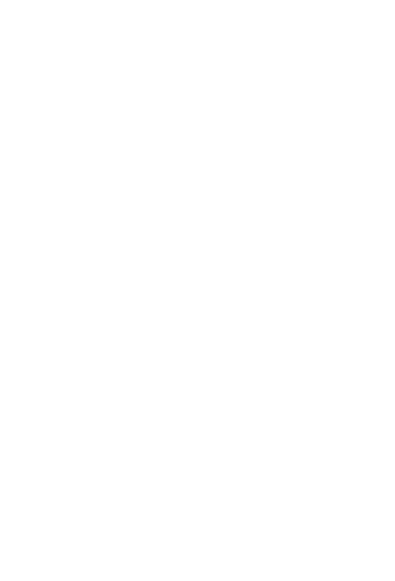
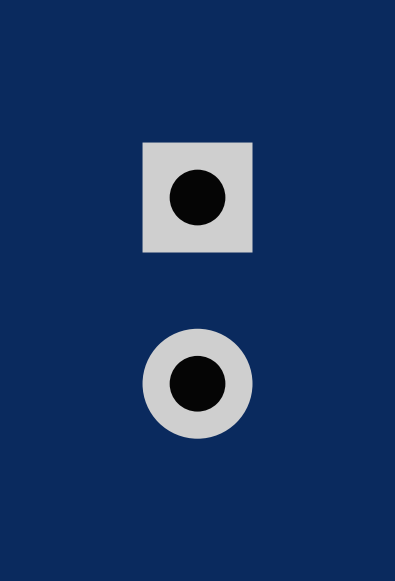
part: none -> (197, 290)

